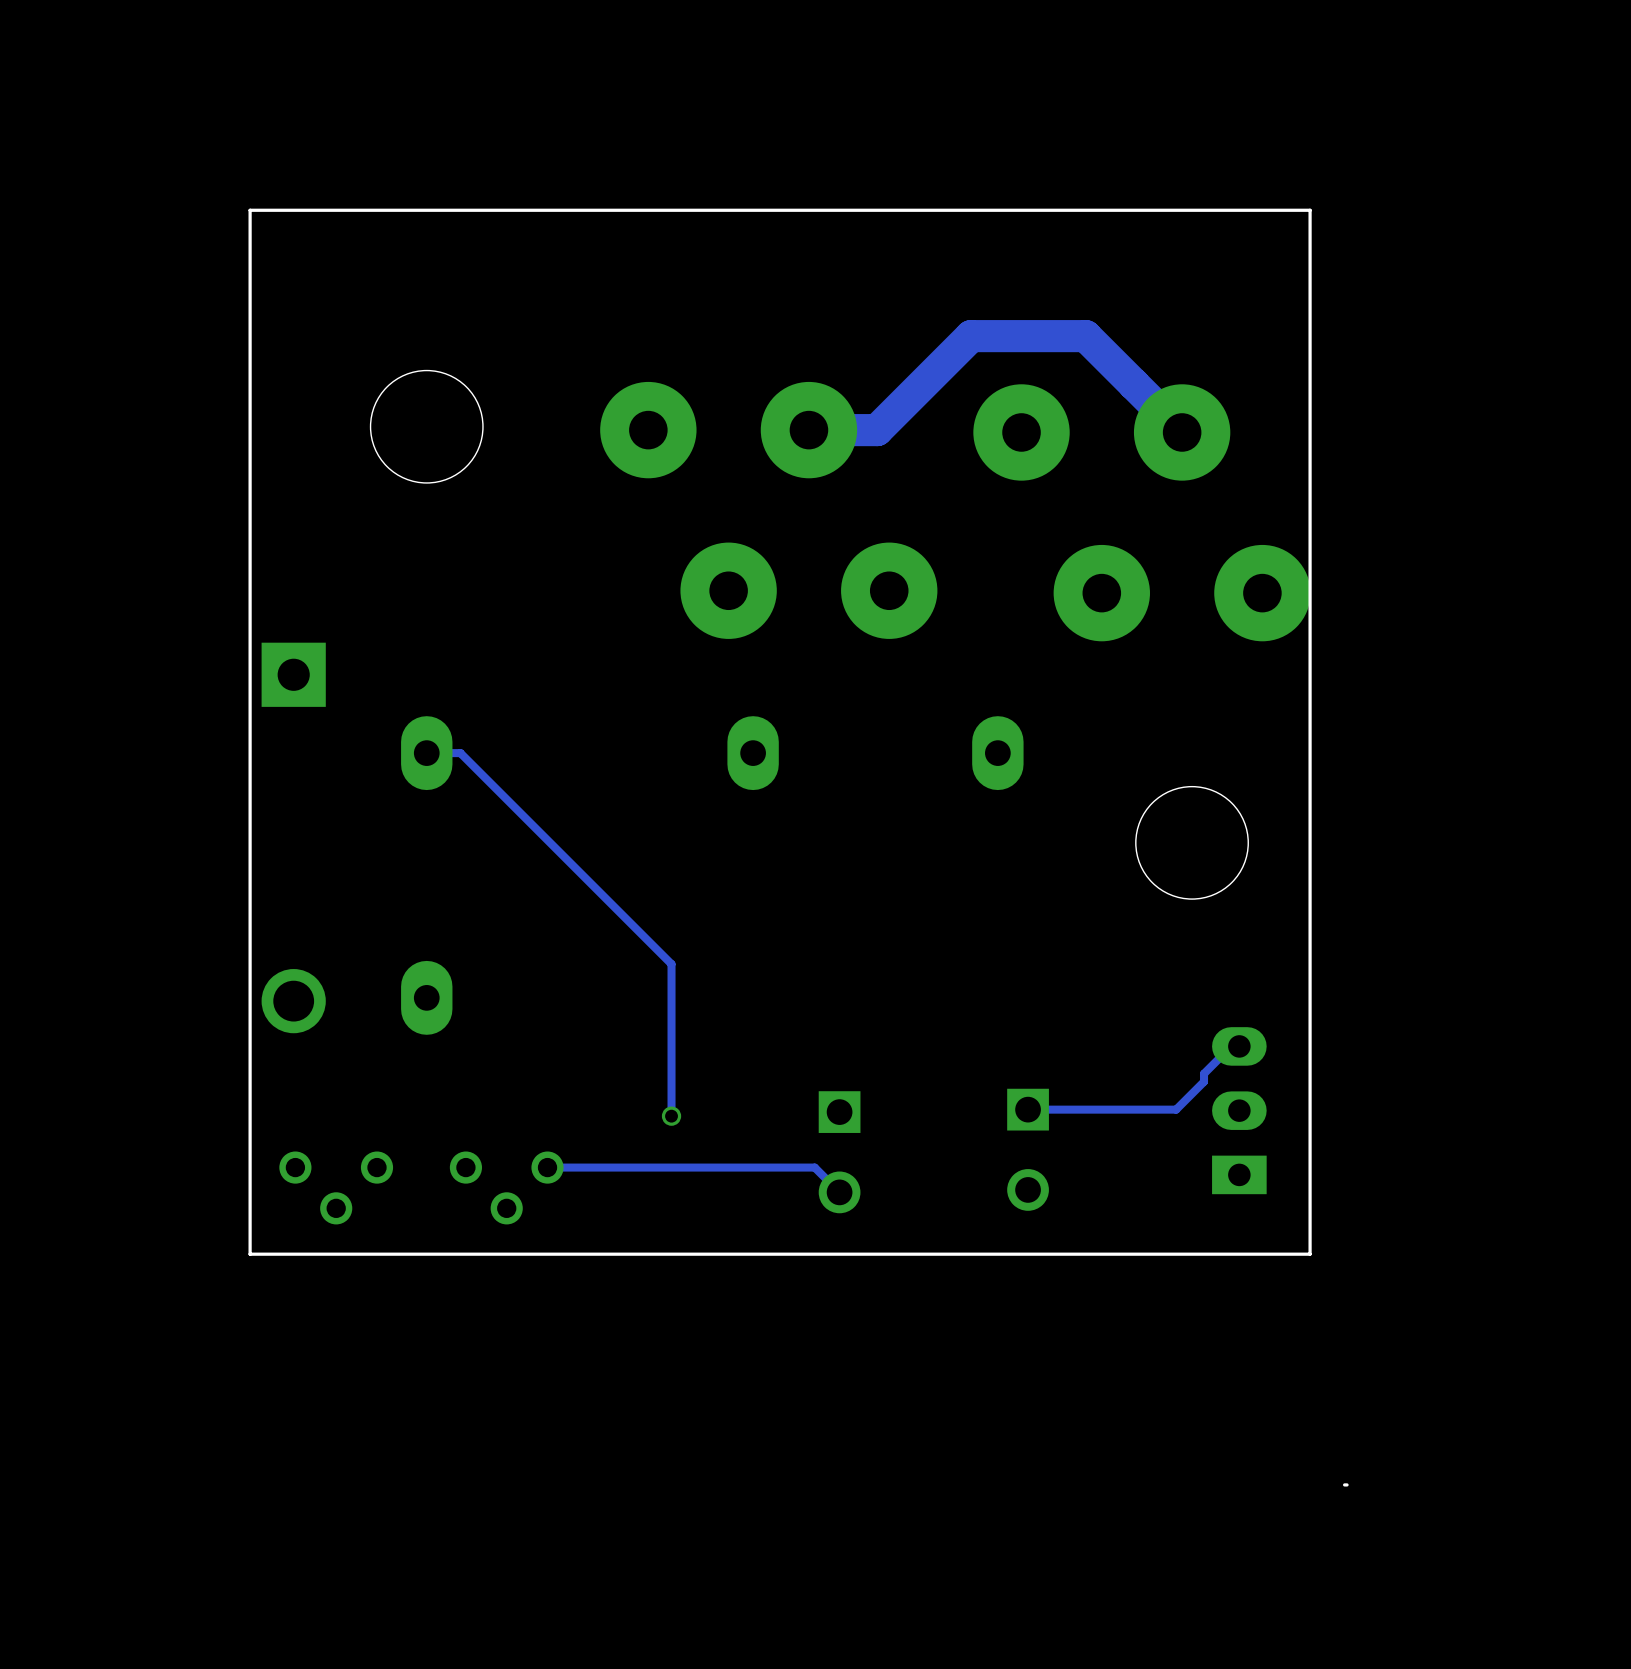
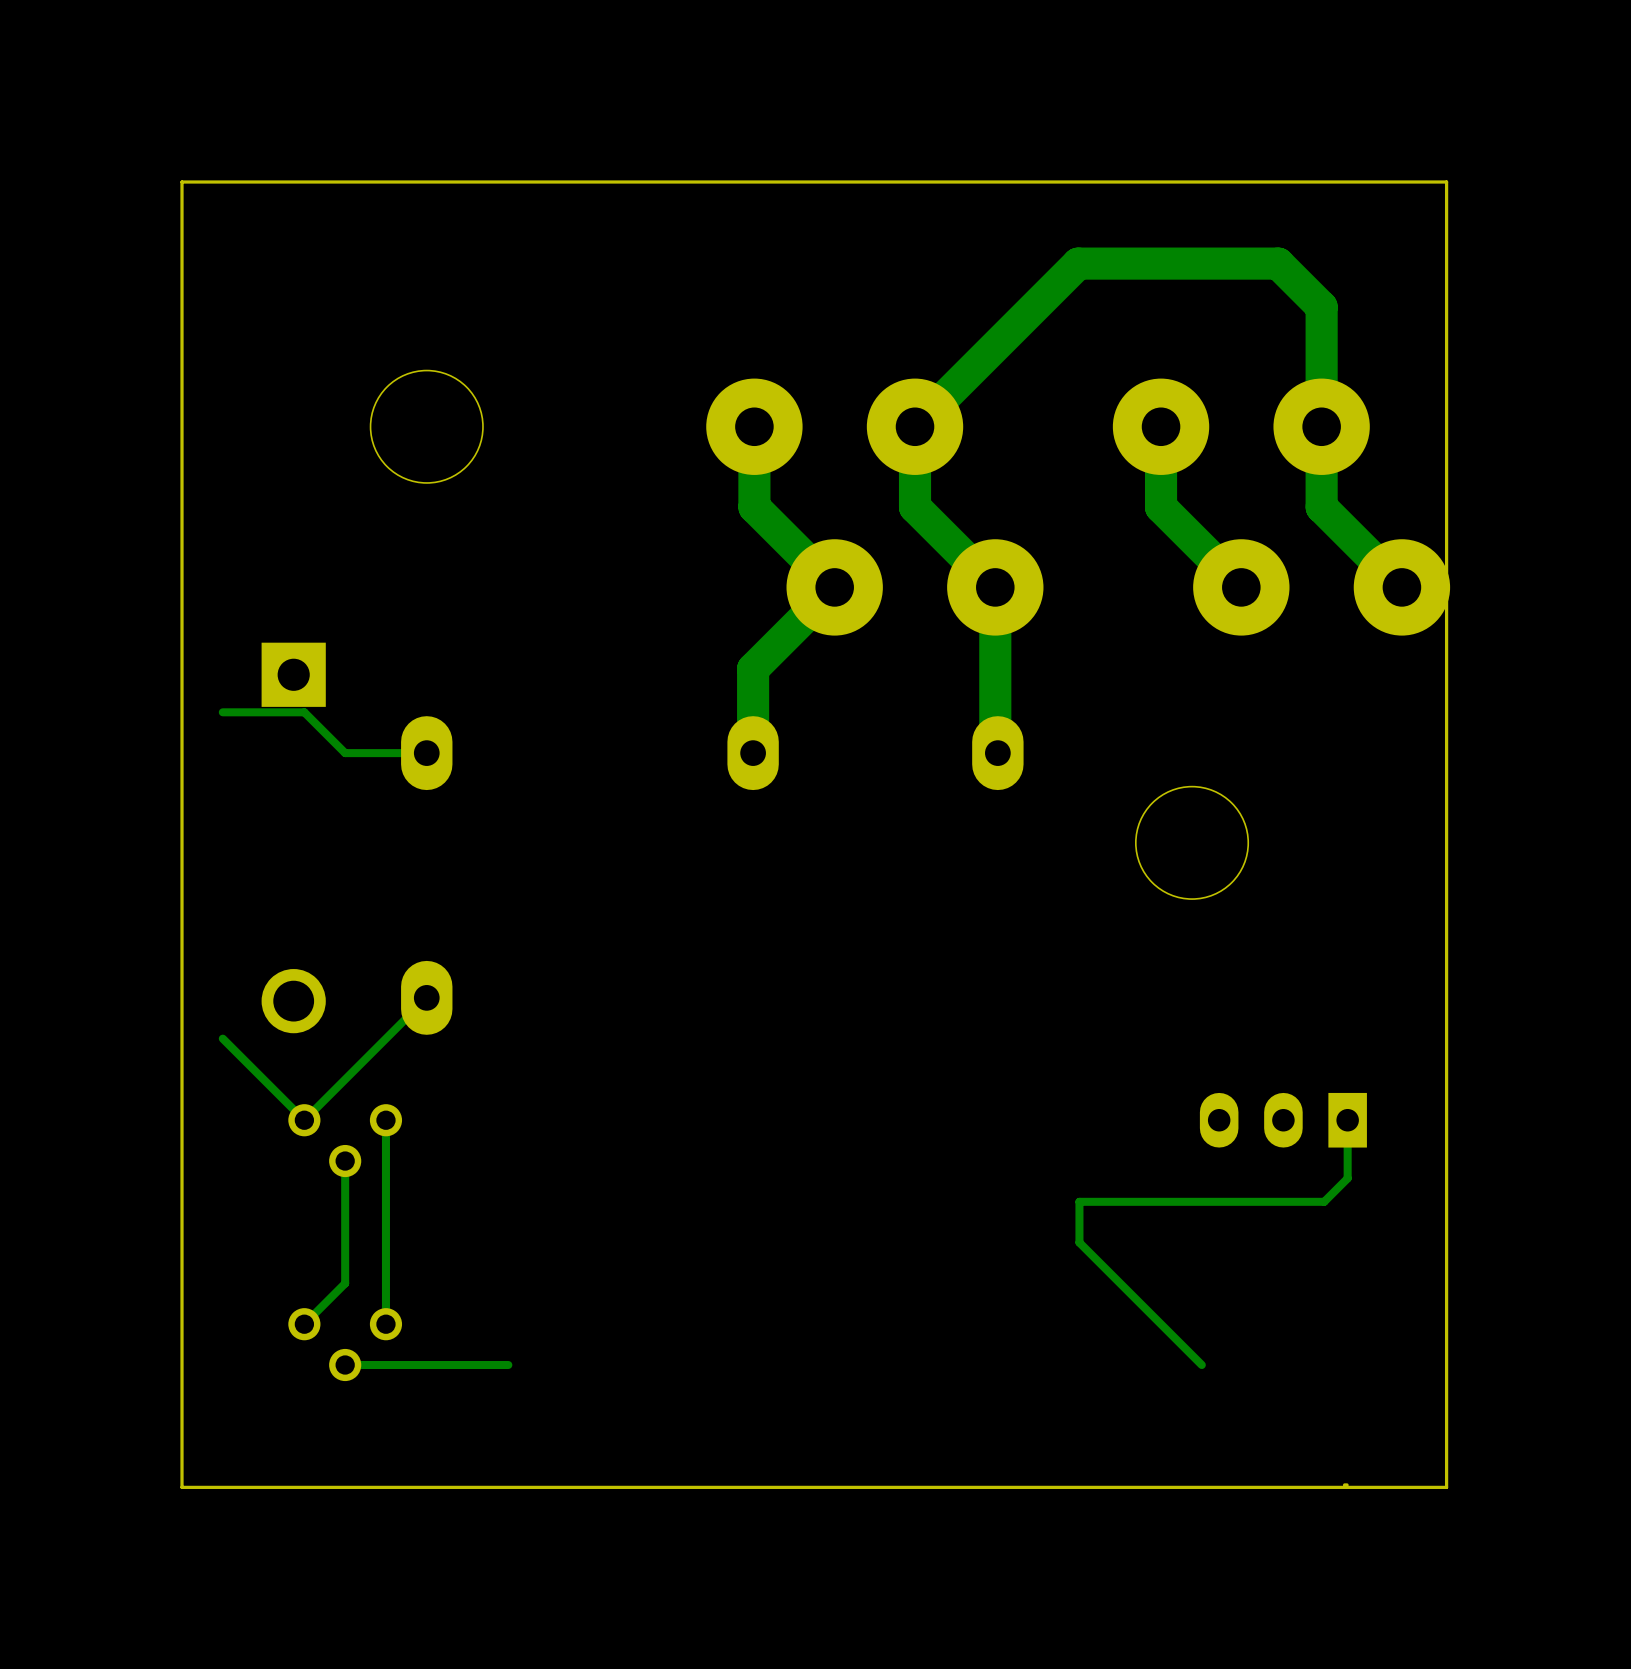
board edge: (1310, 210) (250, 210) (250, 1254) (1310, 1254) (1310, 210) -> (1446, 182) (1446, 1487) (182, 1487) (182, 182) (1446, 182)
track: none -> (754, 426) (754, 507) (834, 587) (753, 668) (753, 753)
track: none -> (1161, 426) (1161, 507) (1241, 587)
track: (808, 430) (877, 430) (971, 336) (1085, 336) (1182, 432) -> none
part: none -> (1281, 507)
part position: (768, 510) -> (874, 507)
part: (1141, 512) -> none
track: none -> (1401, 587) (1321, 507) (1321, 306) (1278, 263) (1078, 263) (915, 426) (915, 507) (995, 587) (995, 750)
track: (426, 753) (460, 753) (671, 964) (671, 1116) -> (426, 753) (345, 753) (304, 712) (222, 712)
track: none -> (426, 997) (304, 1120) (222, 1038)
track: (1239, 1046) (1231, 1046) (1204, 1073) (1204, 1081) (1176, 1109) (1028, 1109) -> none
part rotation: 0° (1239, 1110) -> 90° counterclockwise (1283, 1120)
via: (671, 1116) -> none
track: none -> (385, 1120) (385, 1324)
track: none -> (1347, 1120) (1347, 1178) (1324, 1201) (1079, 1201) (1079, 1242) (1201, 1365)
part: (1028, 1149) -> none
part: (839, 1152) -> none
track: none -> (345, 1161) (345, 1283) (304, 1324)
track: (547, 1167) (814, 1167) (839, 1192) -> none
part position: (336, 1187) -> (345, 1140)
part: (506, 1187) -> none
part: none -> (345, 1344)
track: none -> (508, 1365) (345, 1365)

